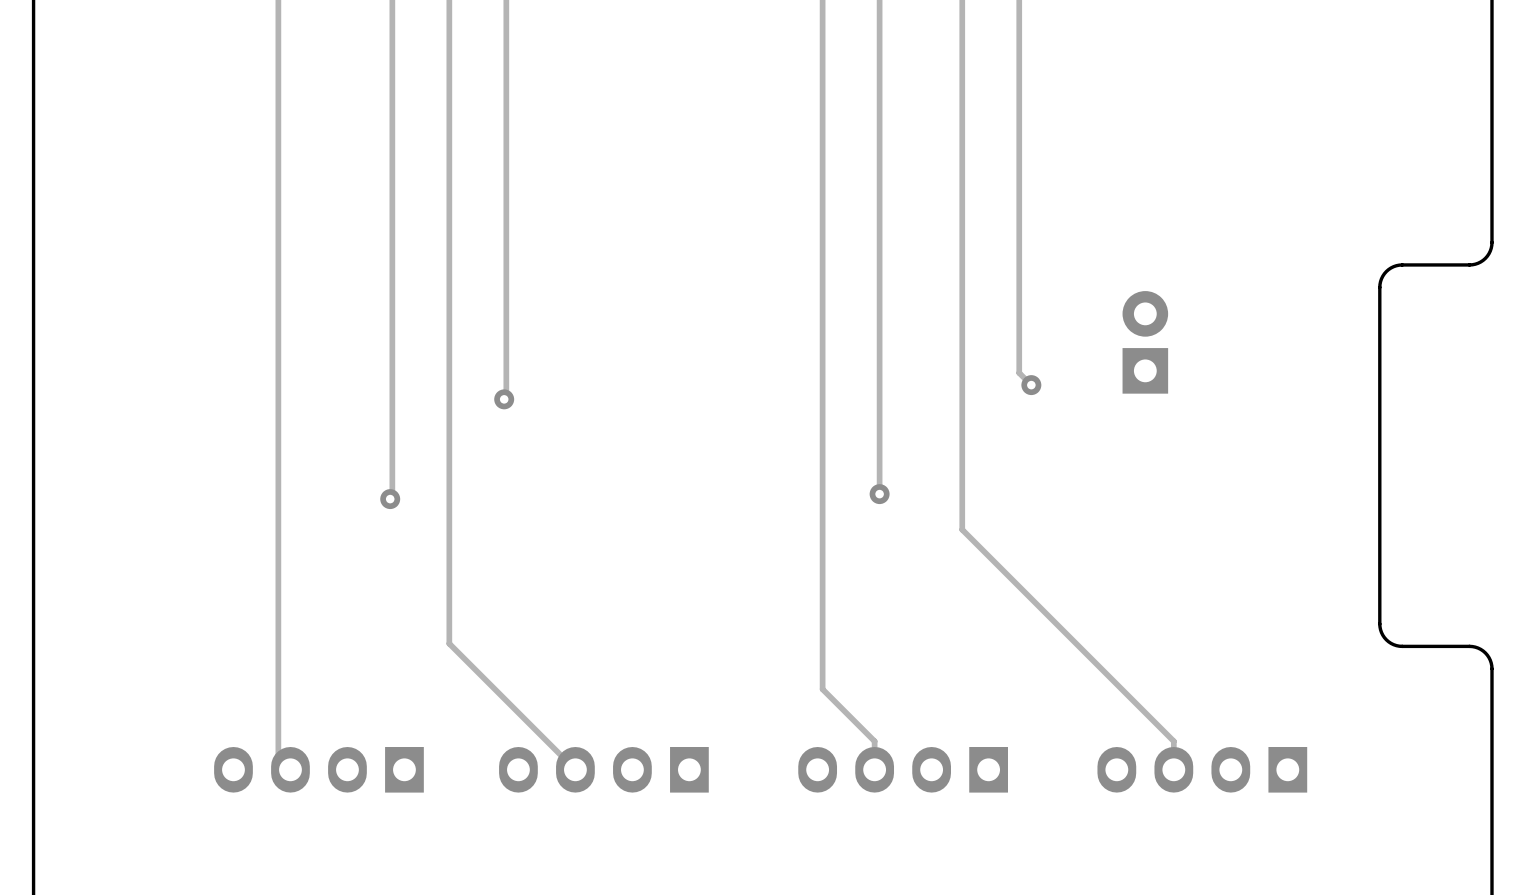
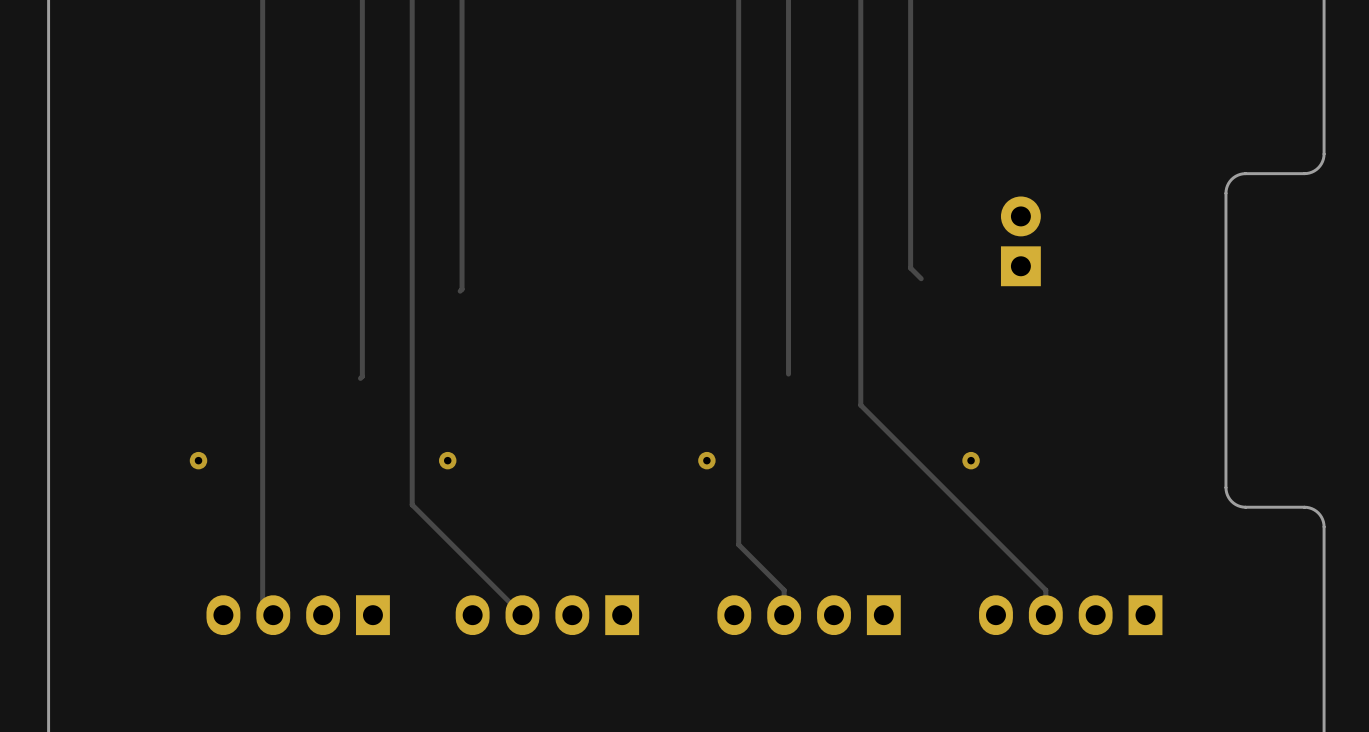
via: (1031, 385) -> none
via: (504, 399) -> none
via: (879, 494) -> none
via: (390, 499) -> none
via: none -> (198, 460)
via: none -> (447, 460)
via: none -> (706, 460)
via: none -> (971, 460)

